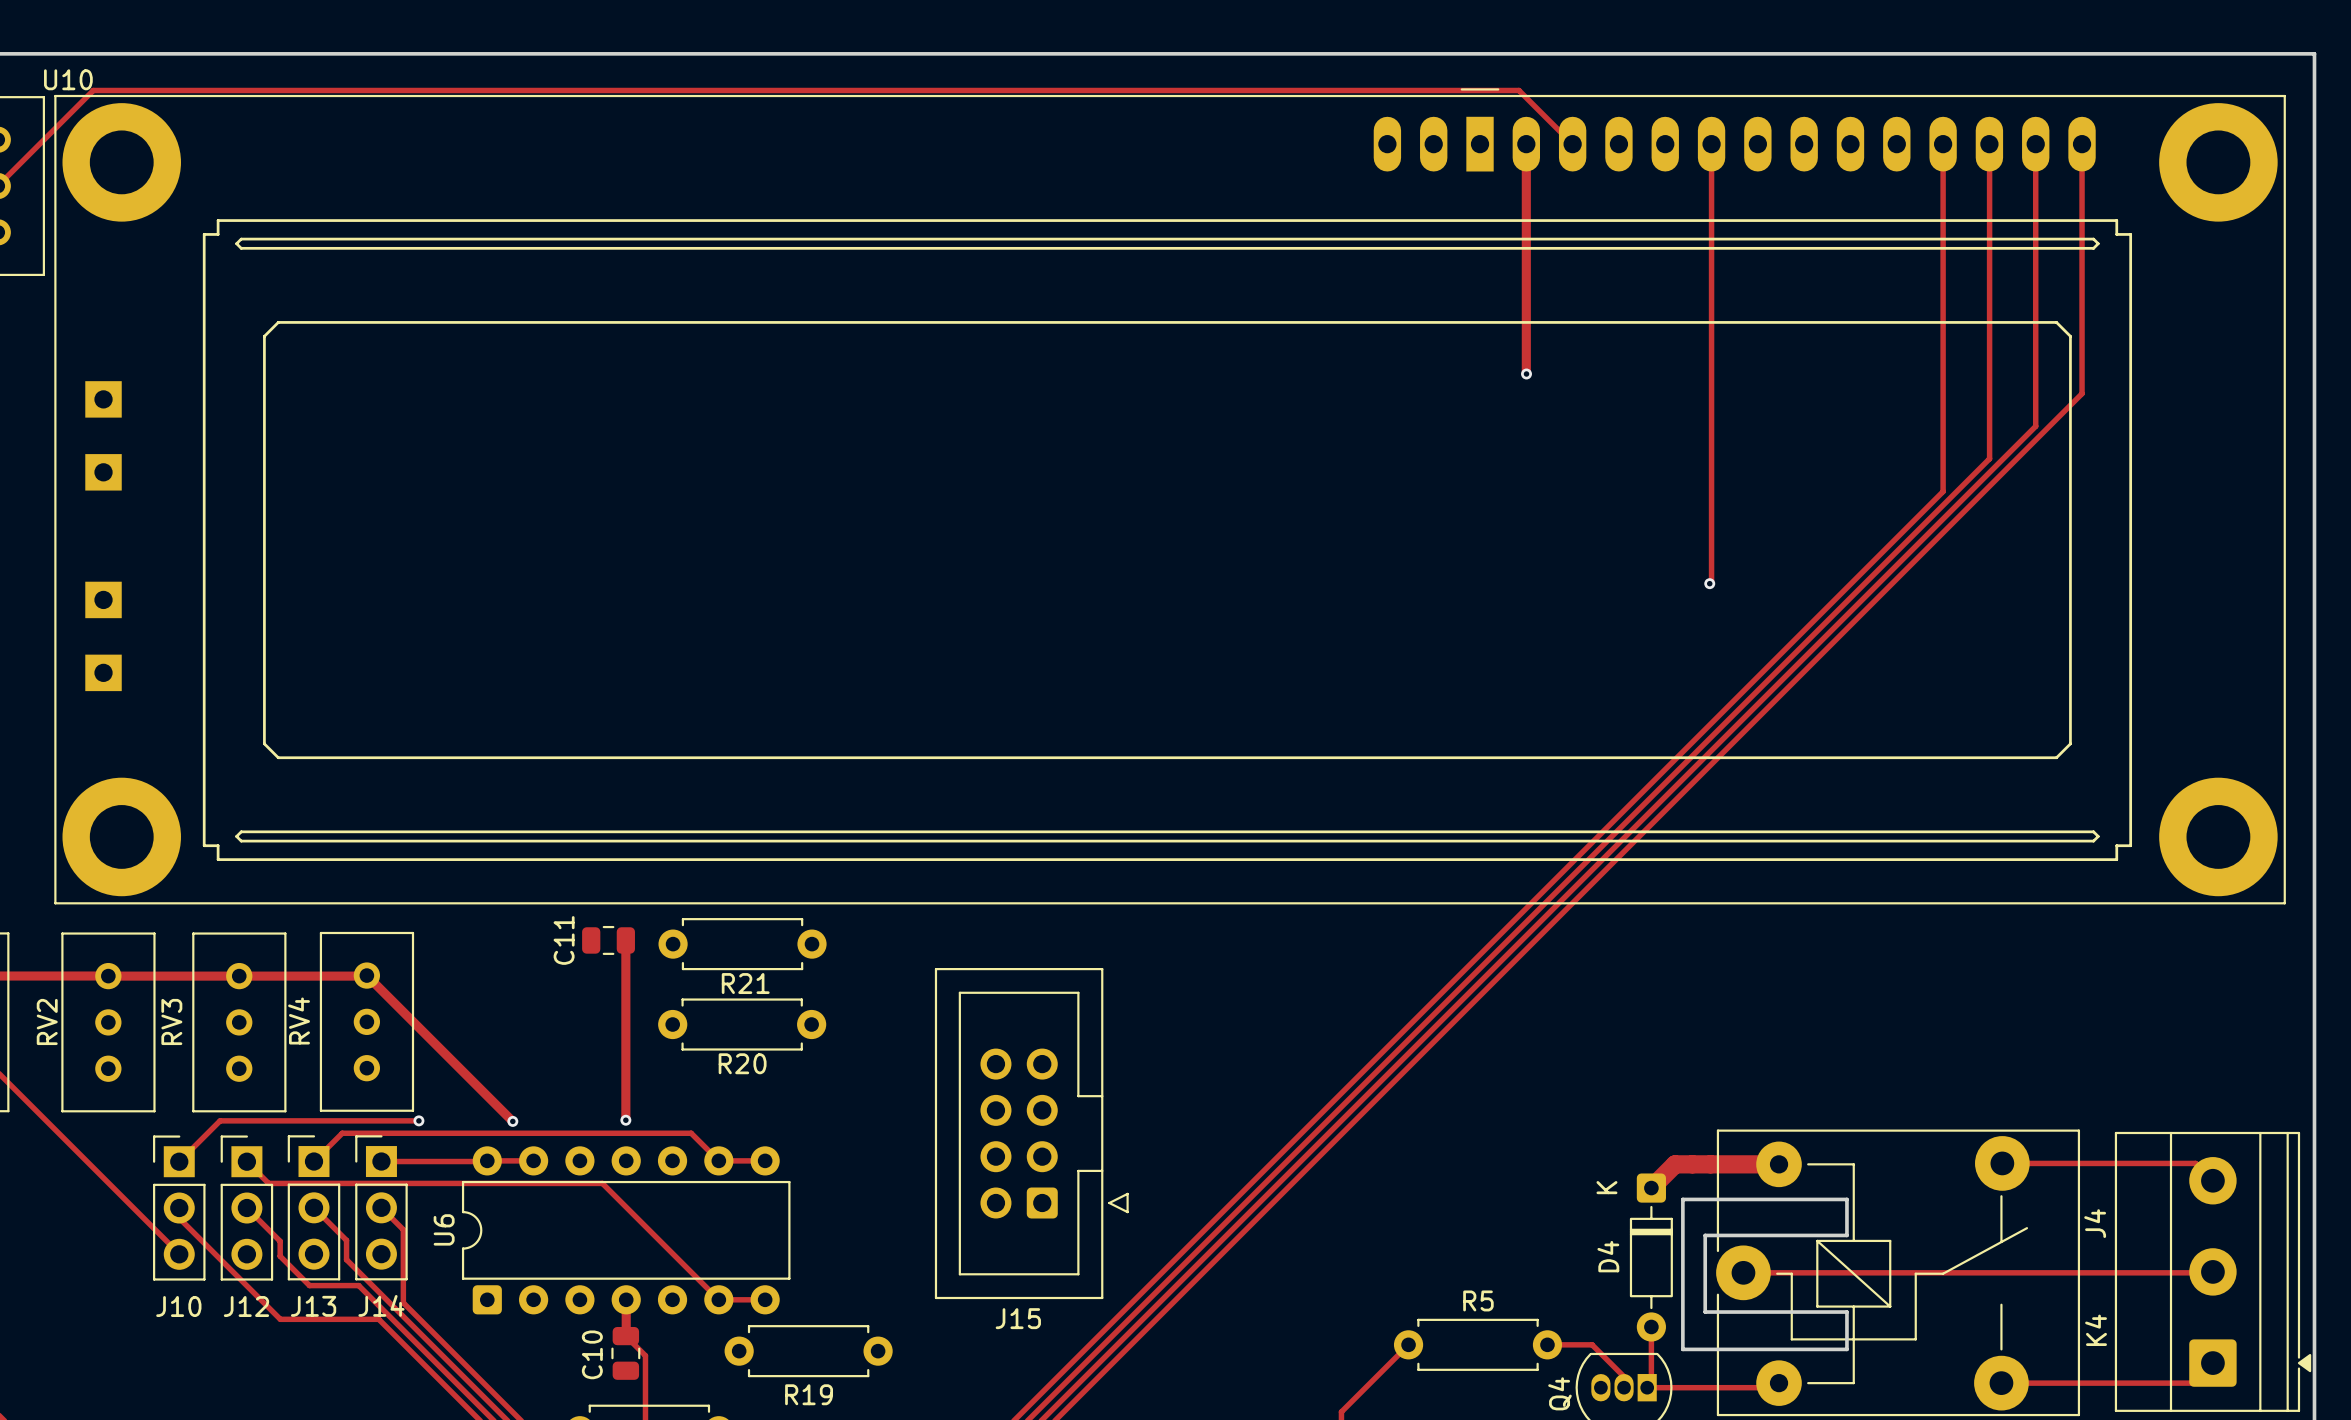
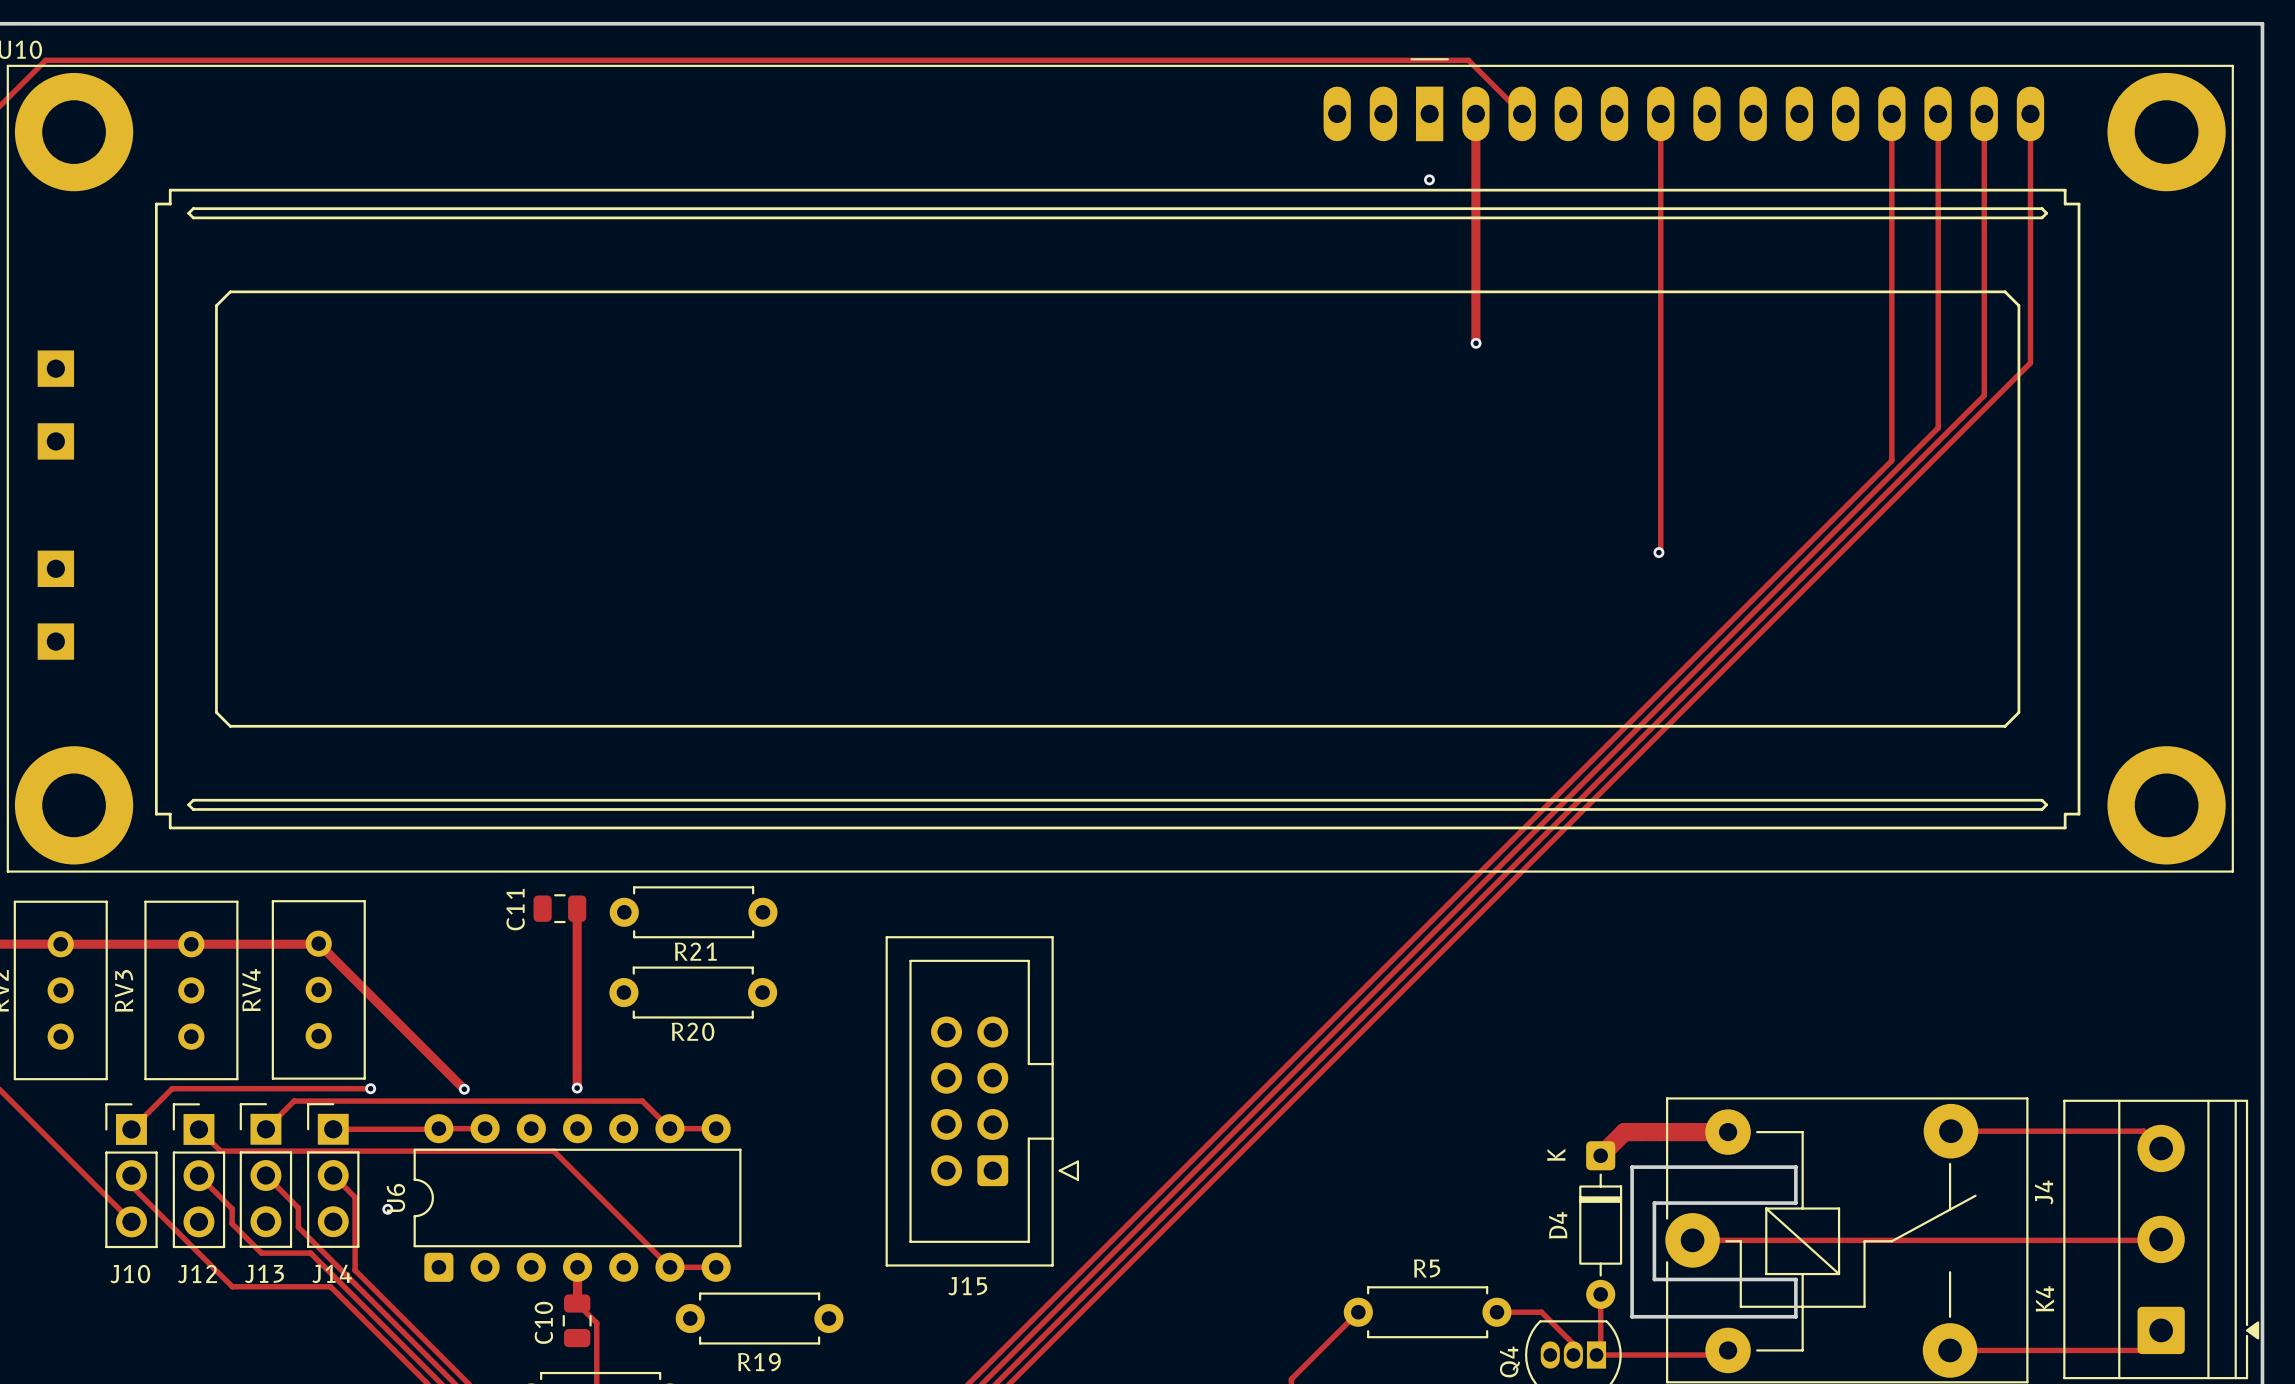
via: none -> (1429, 179)
via: none -> (387, 1209)

